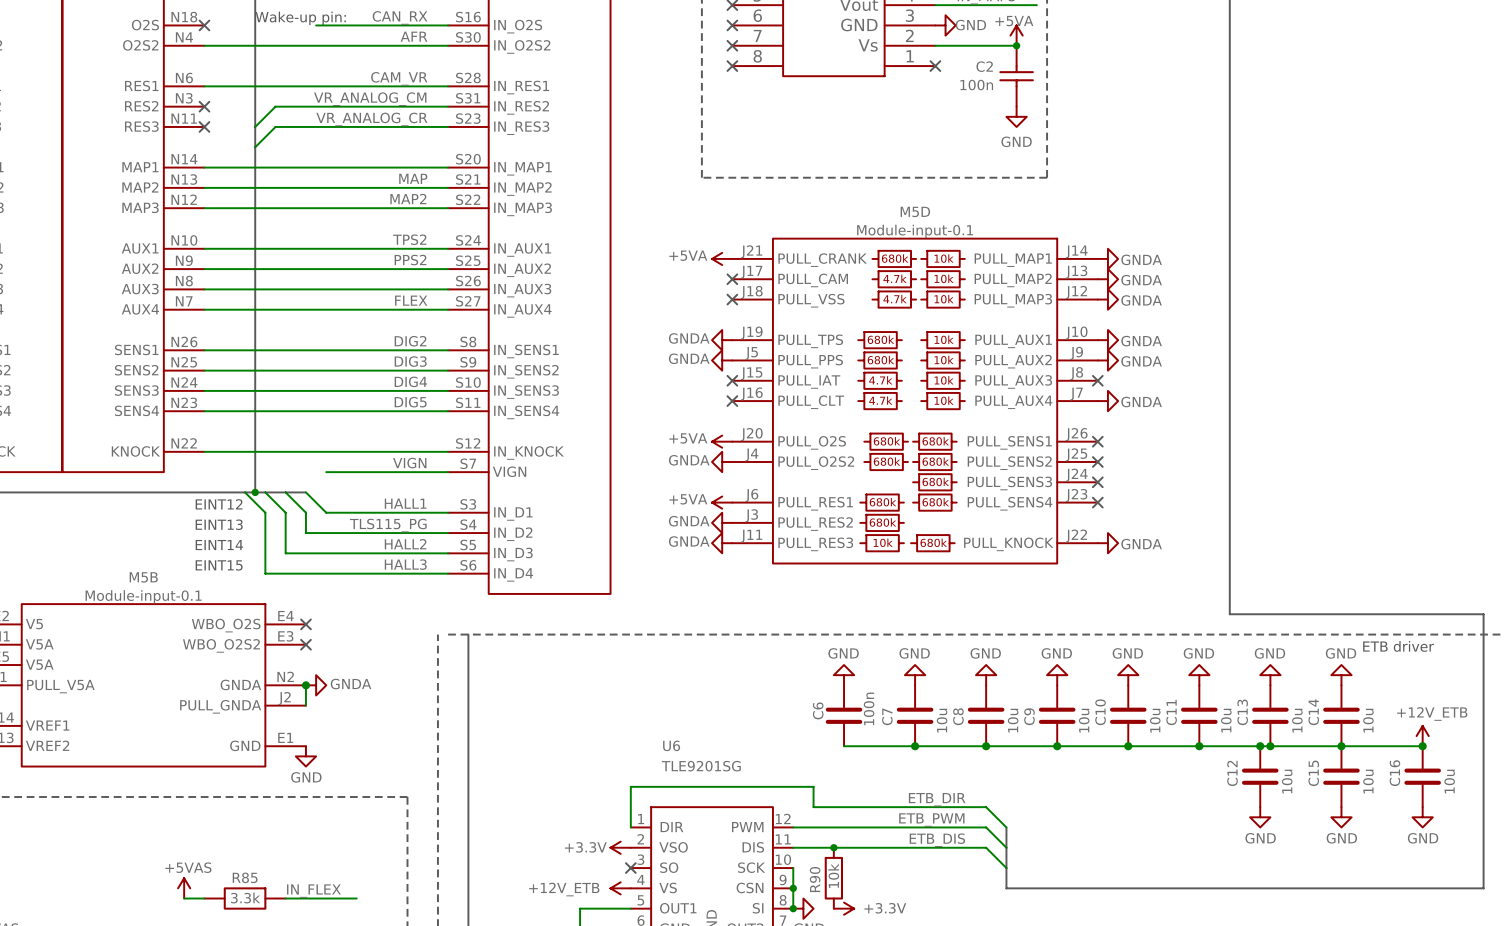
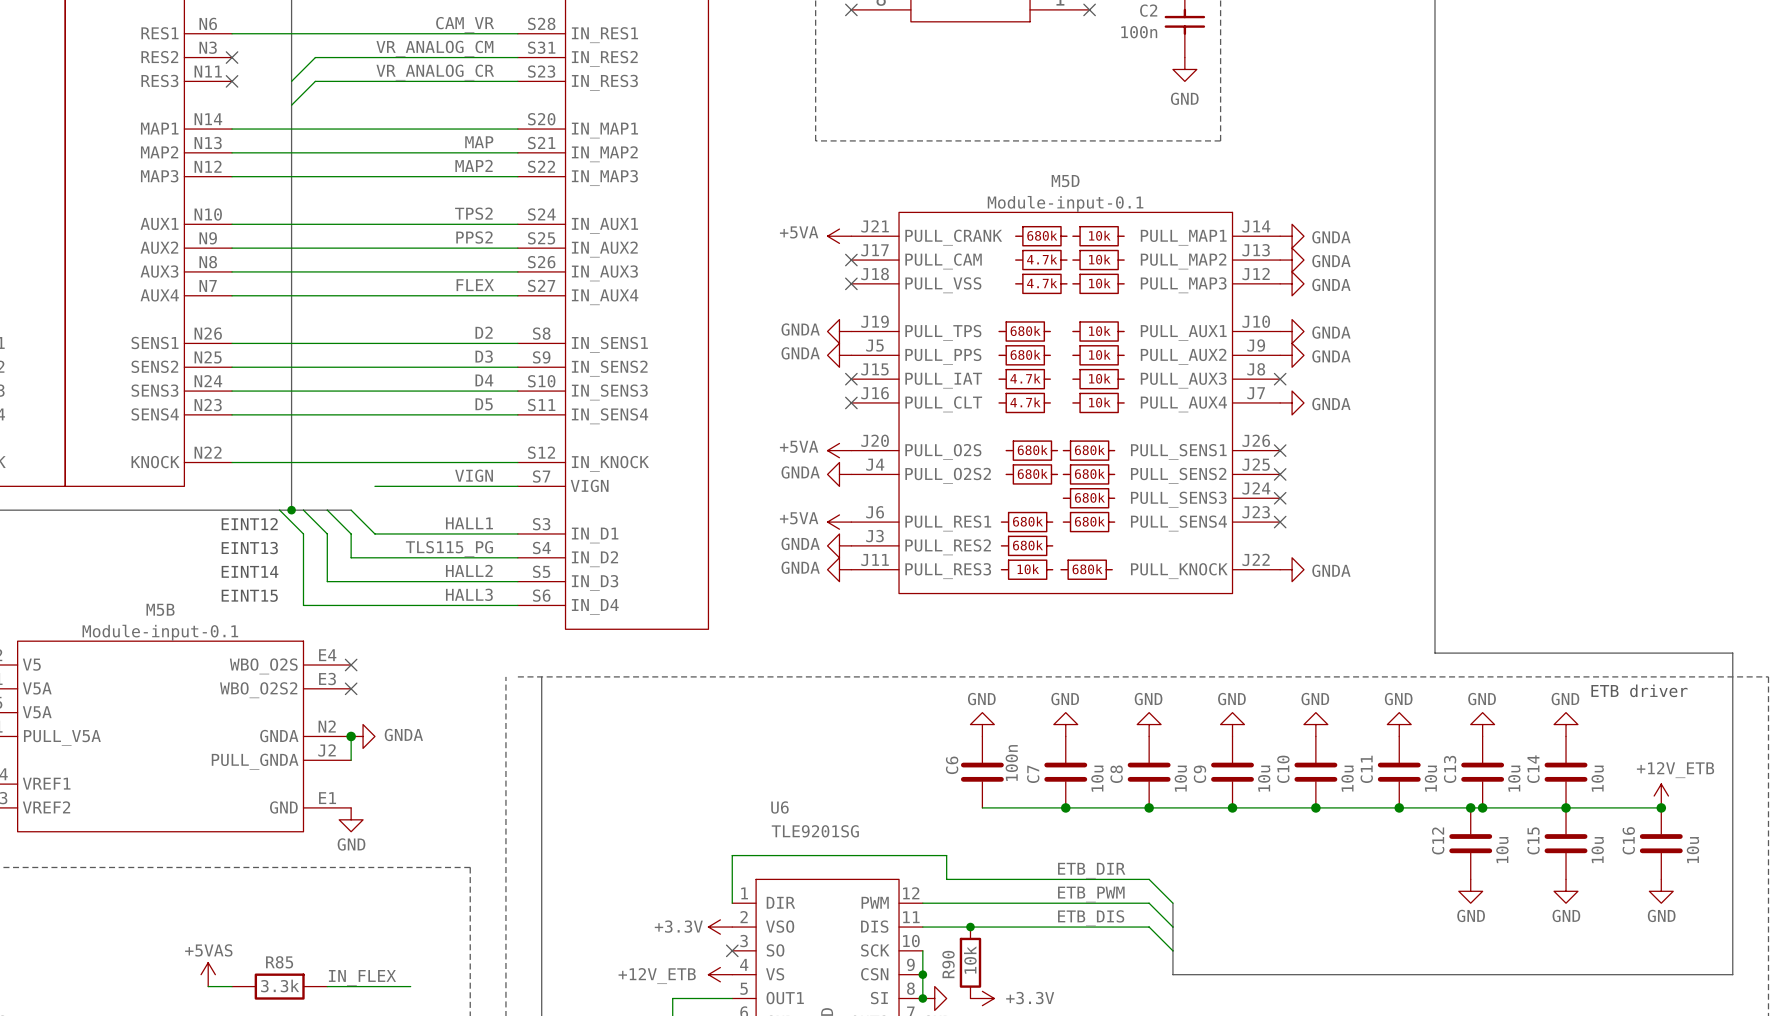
label: DIG2 (410, 341) -> D2 (484, 332)
label: DIG3 (410, 361) -> D3 (484, 356)
label: DIG4 (410, 381) -> D4 (484, 380)
label: DIG5 (410, 402) -> D5 (484, 404)

